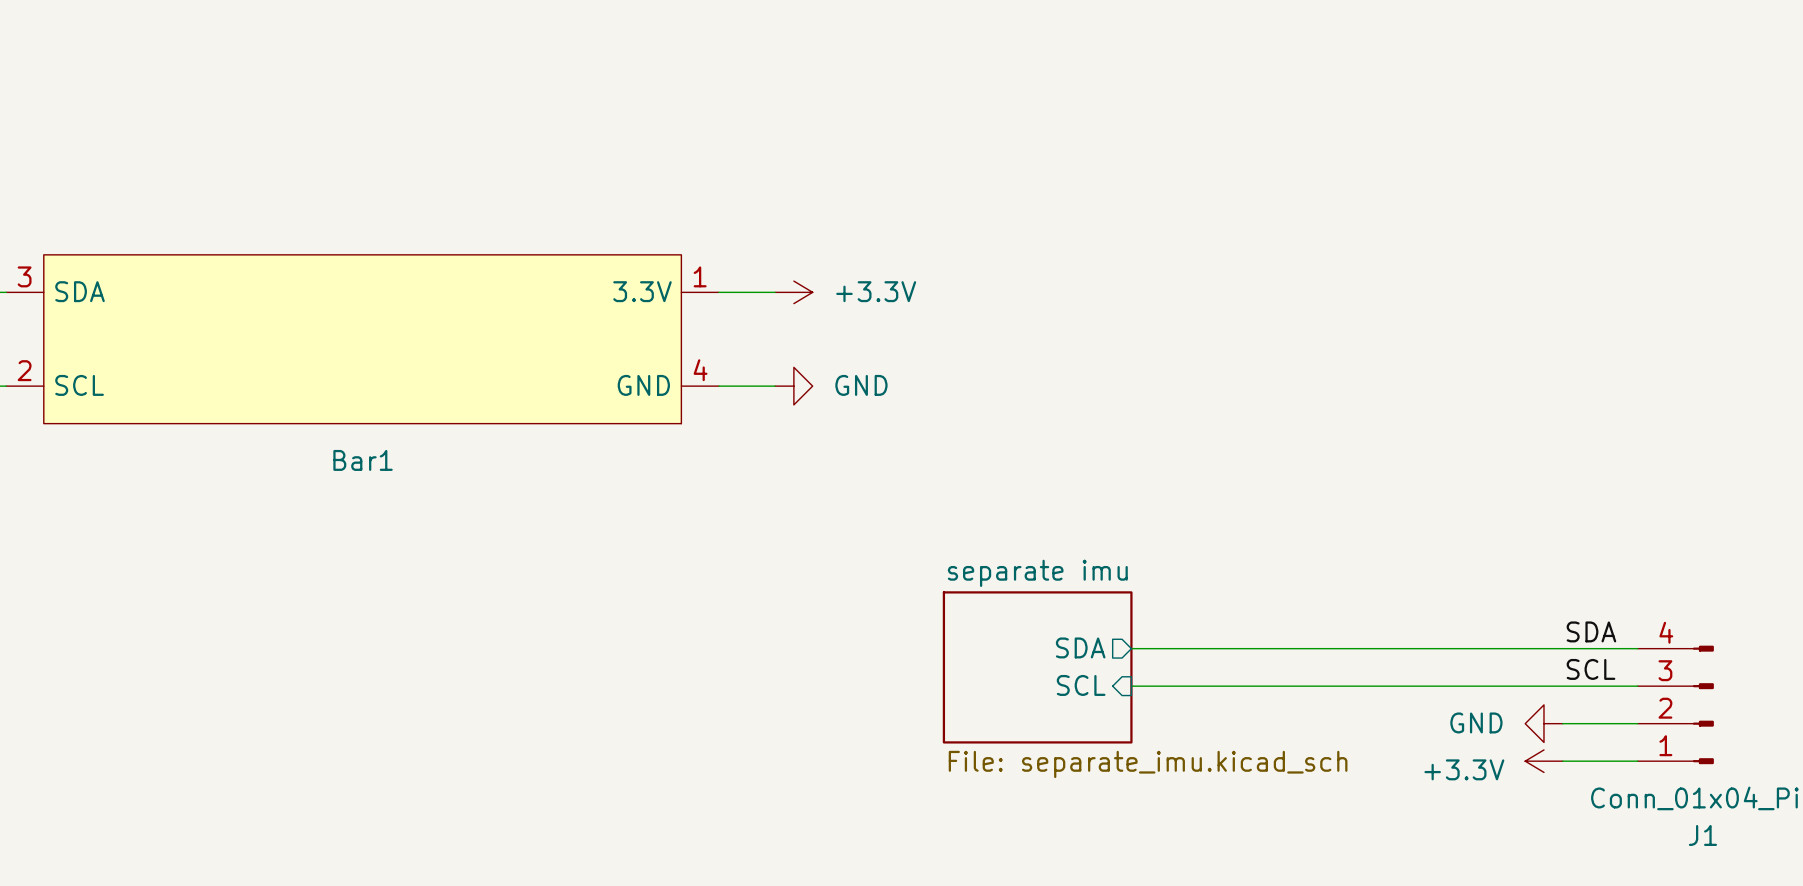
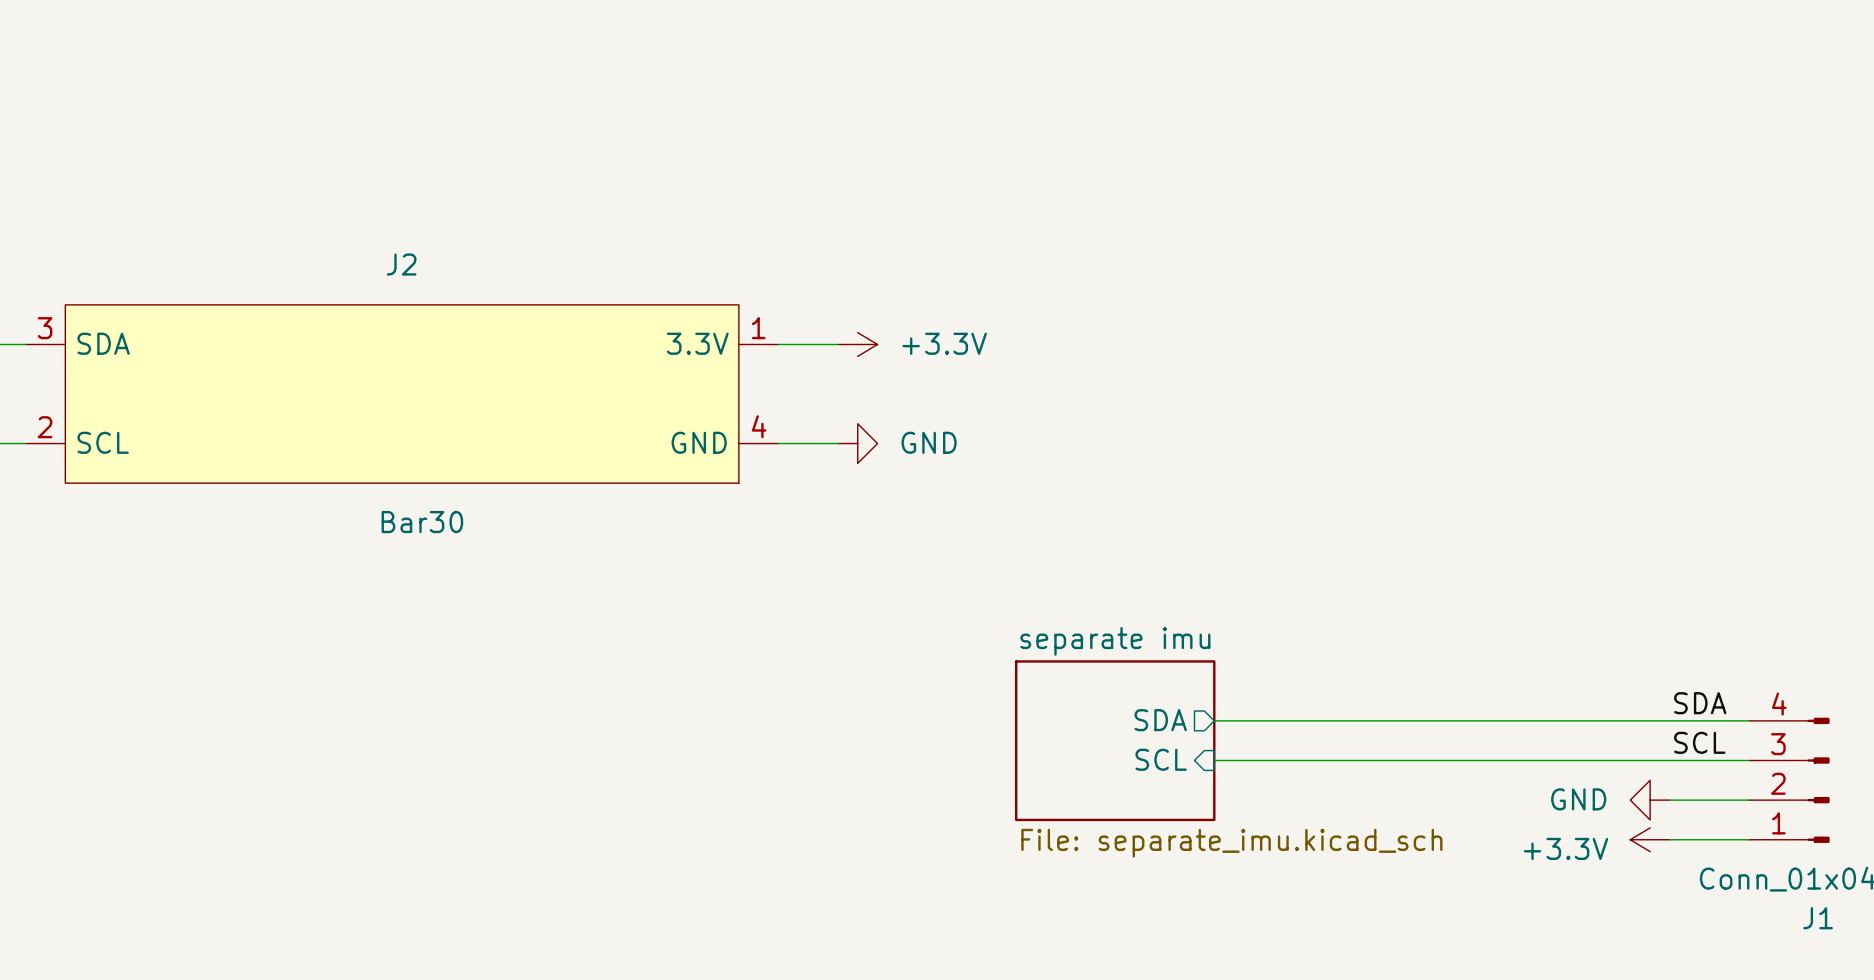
Bar1 name: Bar1 (363, 460) -> J2 (401, 264)
Bar1 value: none -> Bar30 (422, 522)

